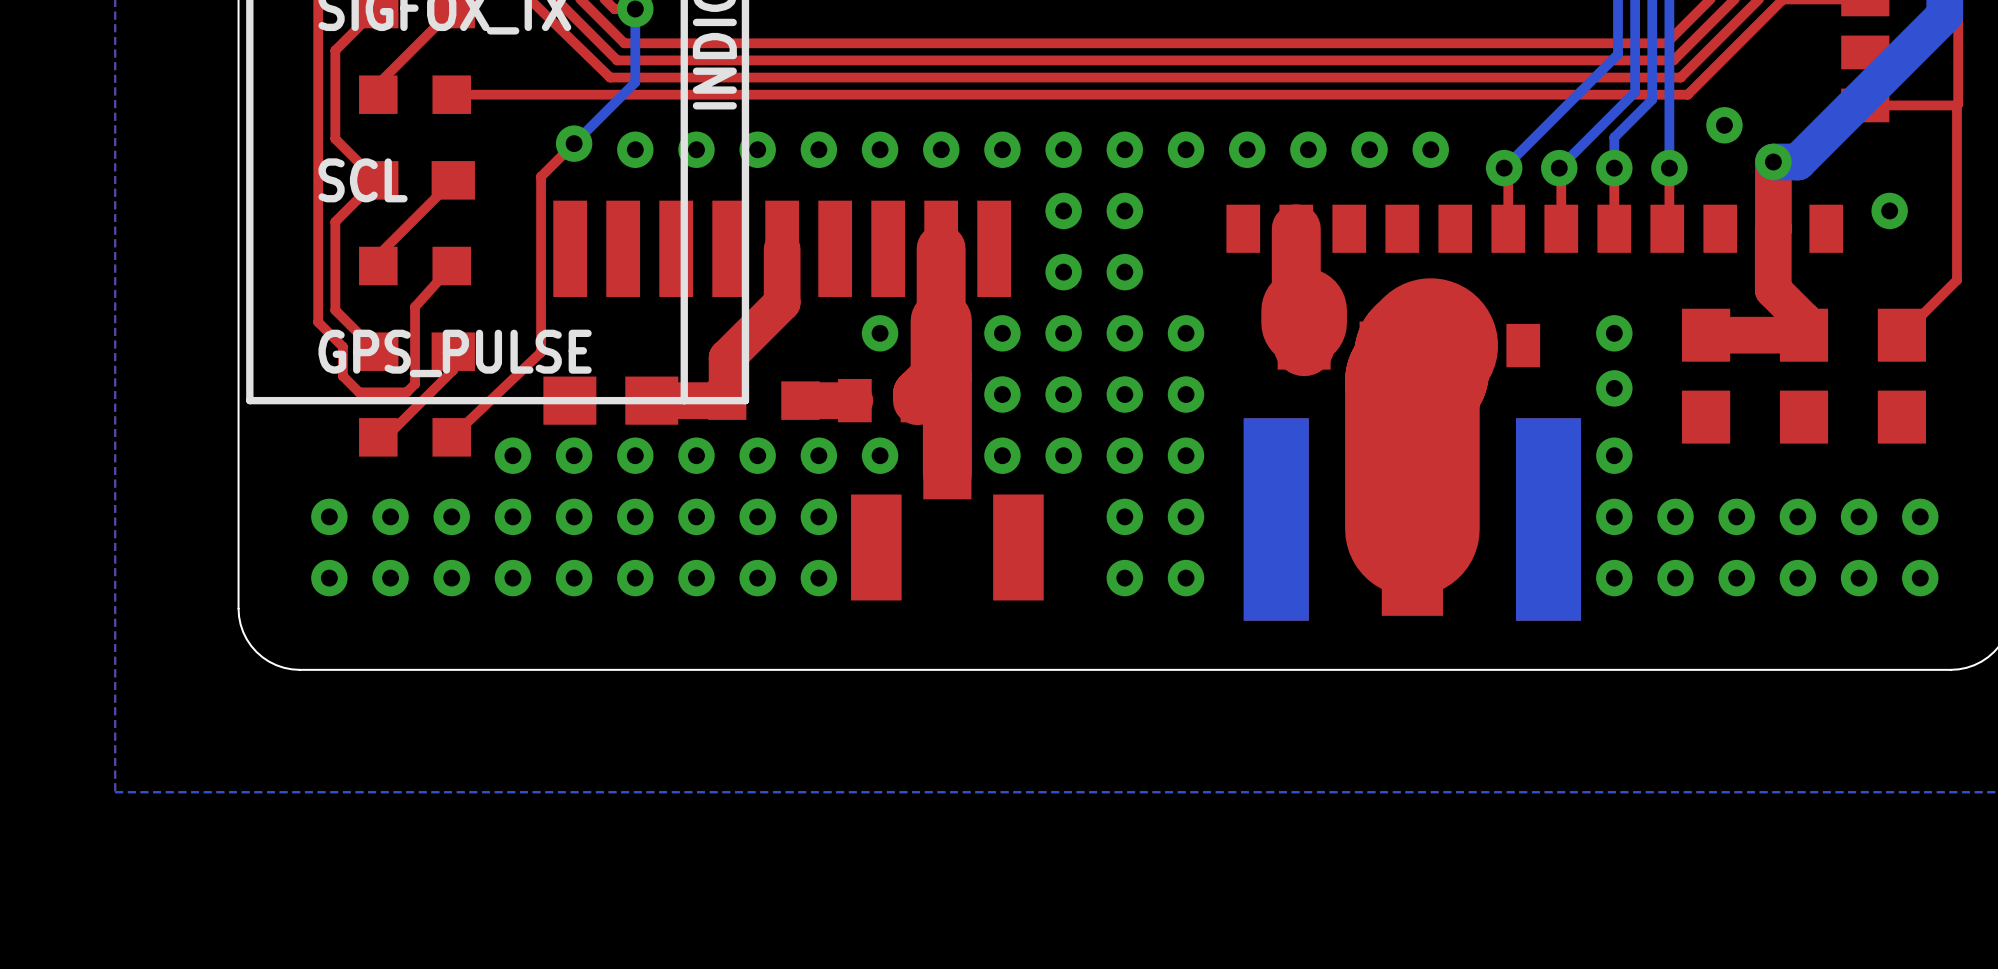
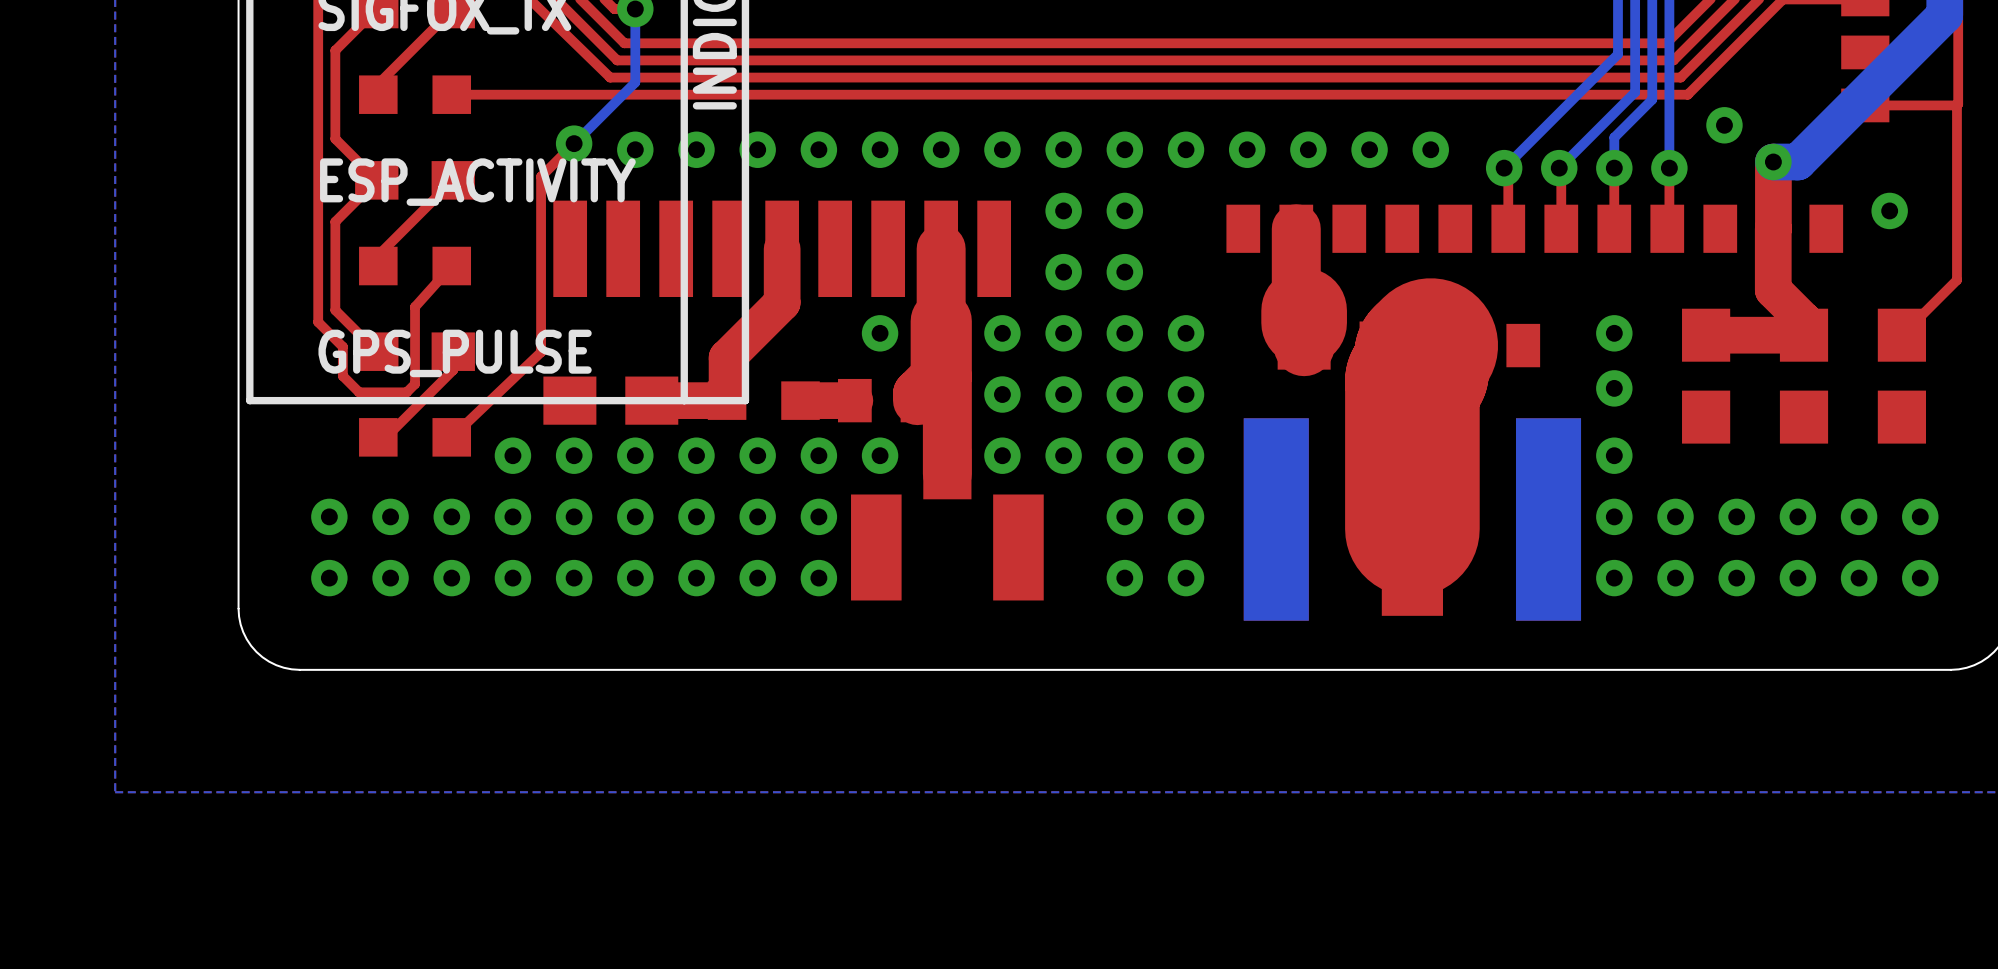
text: SCL (363, 180) -> ESP_ACTIVITY (477, 182)

